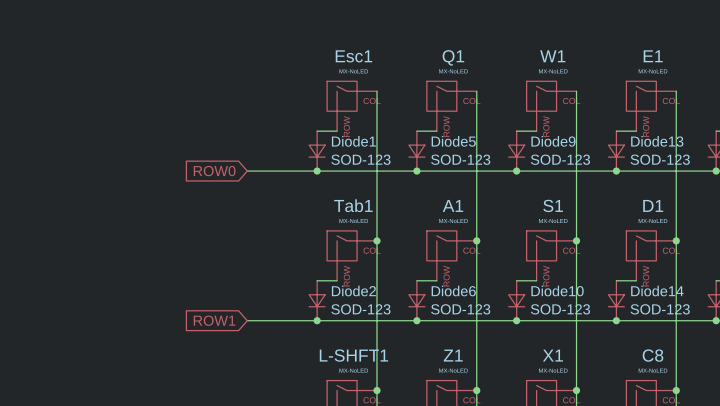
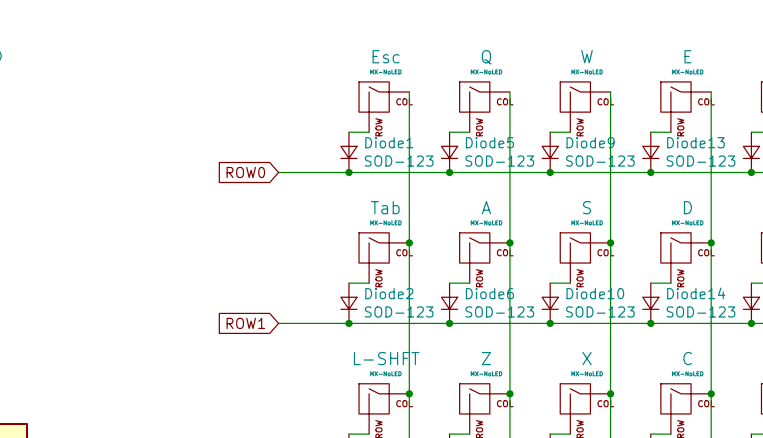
Esc1 name: Esc1 (353, 56) -> Esc (386, 56)
W1 name: W1 (552, 56) -> W (587, 56)
E1 name: E1 (653, 56) -> E (687, 56)
Q1 name: Q1 (453, 57) -> Q (486, 57)
Tab1 name: Tab1 (353, 205) -> Tab (385, 207)
A1 name: A1 (453, 205) -> A (486, 207)
S1 name: S1 (553, 205) -> S (587, 207)
D1 name: D1 (653, 205) -> D (687, 207)
L-SHFT1 name: L-SHFT1 (353, 355) -> L-SHFT (386, 358)
Z1 name: Z1 (453, 355) -> Z (486, 358)
X1 name: X1 (552, 355) -> X (587, 358)
C8 name: C8 (652, 355) -> C (687, 358)

